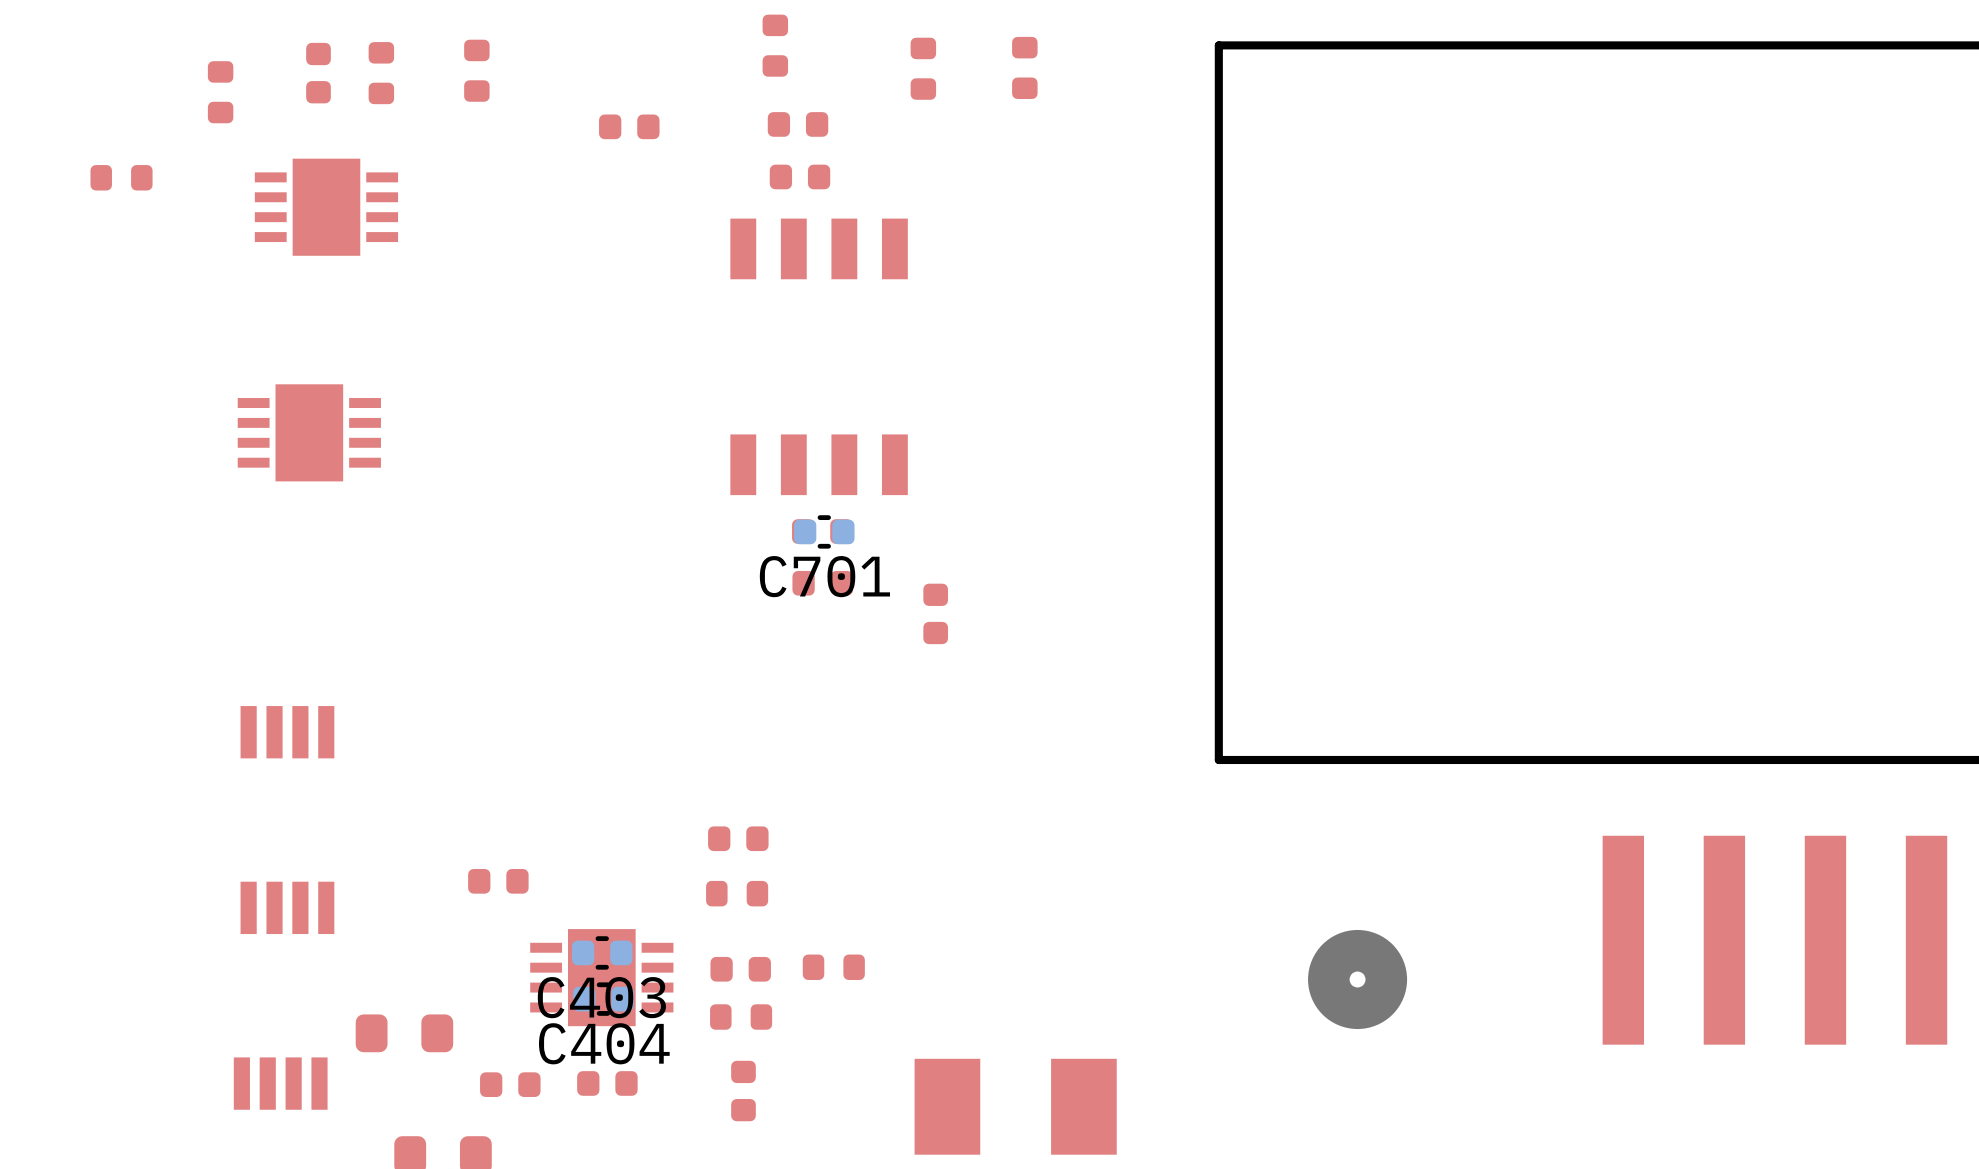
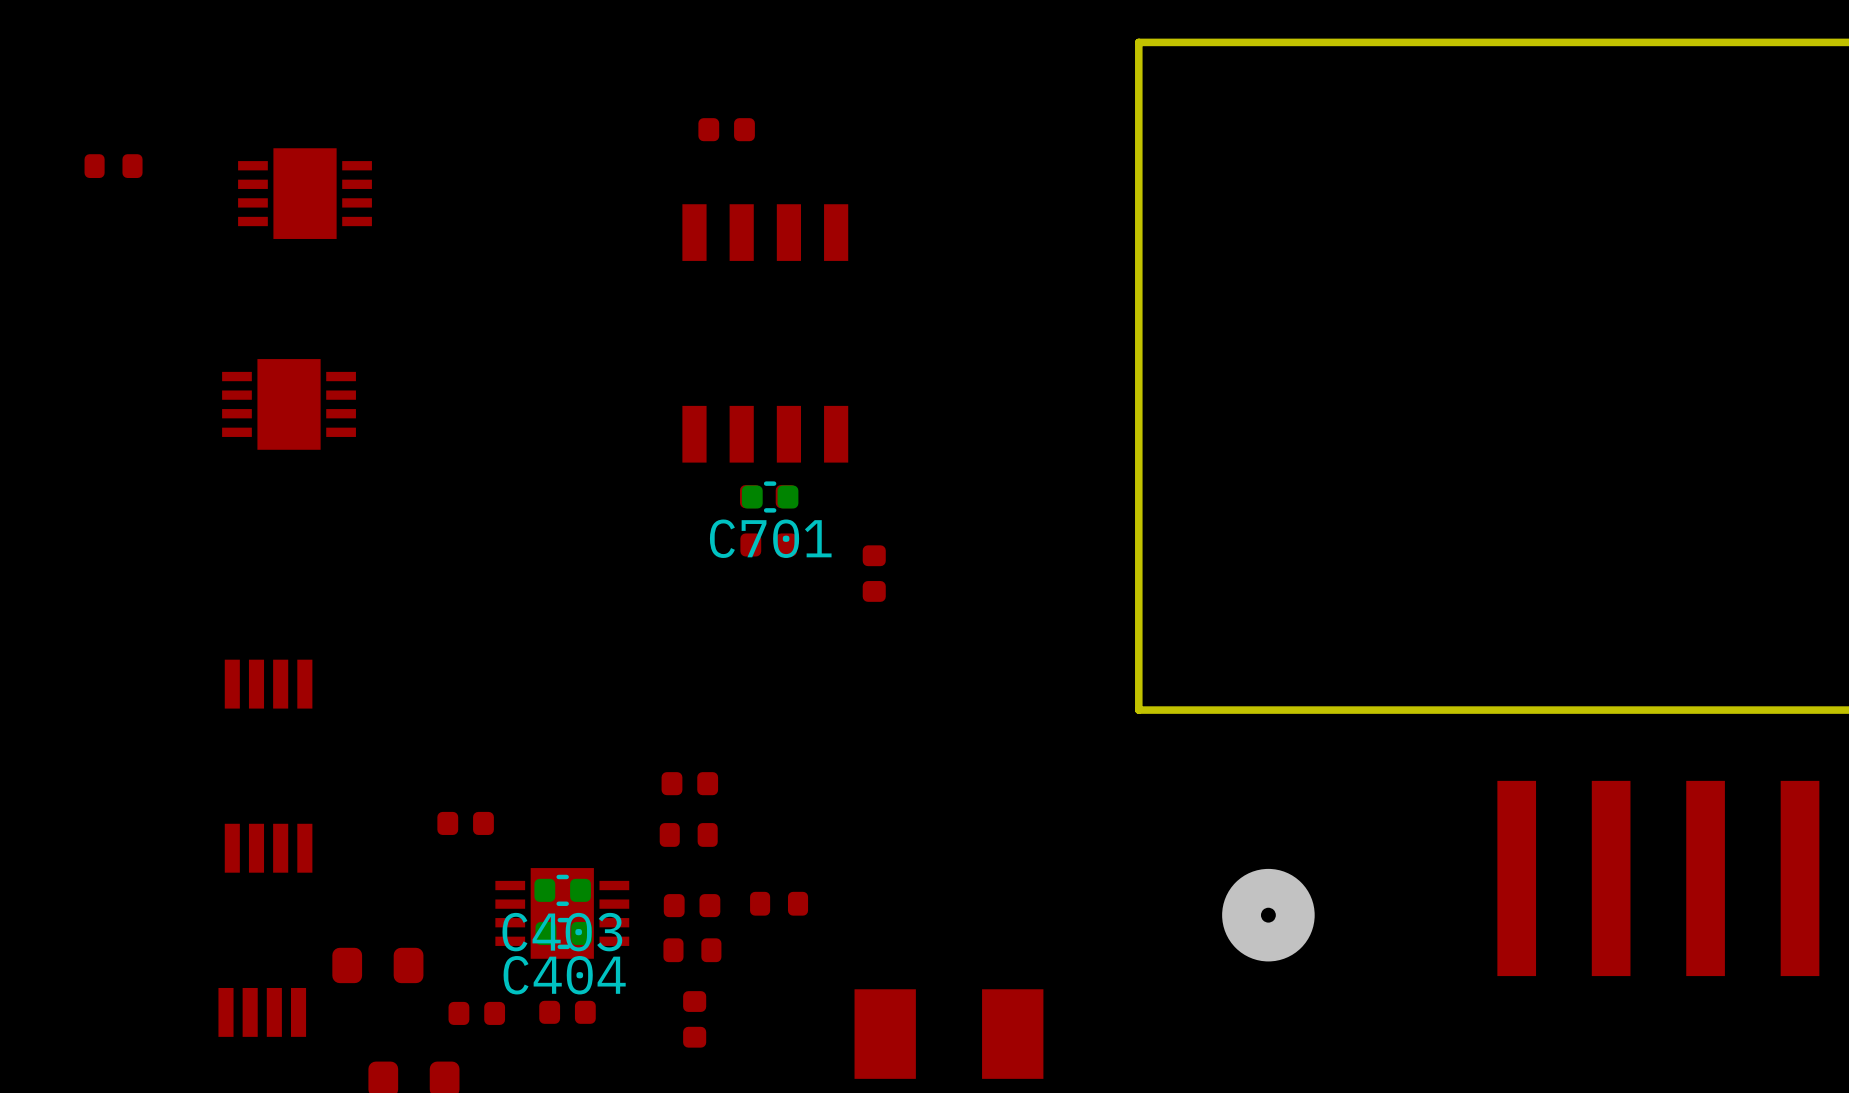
part: (775, 45) -> none
part: (1024, 67) -> none
part: (923, 68) -> none
part: (476, 70) -> none
part: (318, 73) -> none
part: (381, 73) -> none
part: (220, 92) -> none
part: (798, 124) -> none
part: (629, 126) -> none
part: none -> (726, 129)
part: (799, 176) -> none

